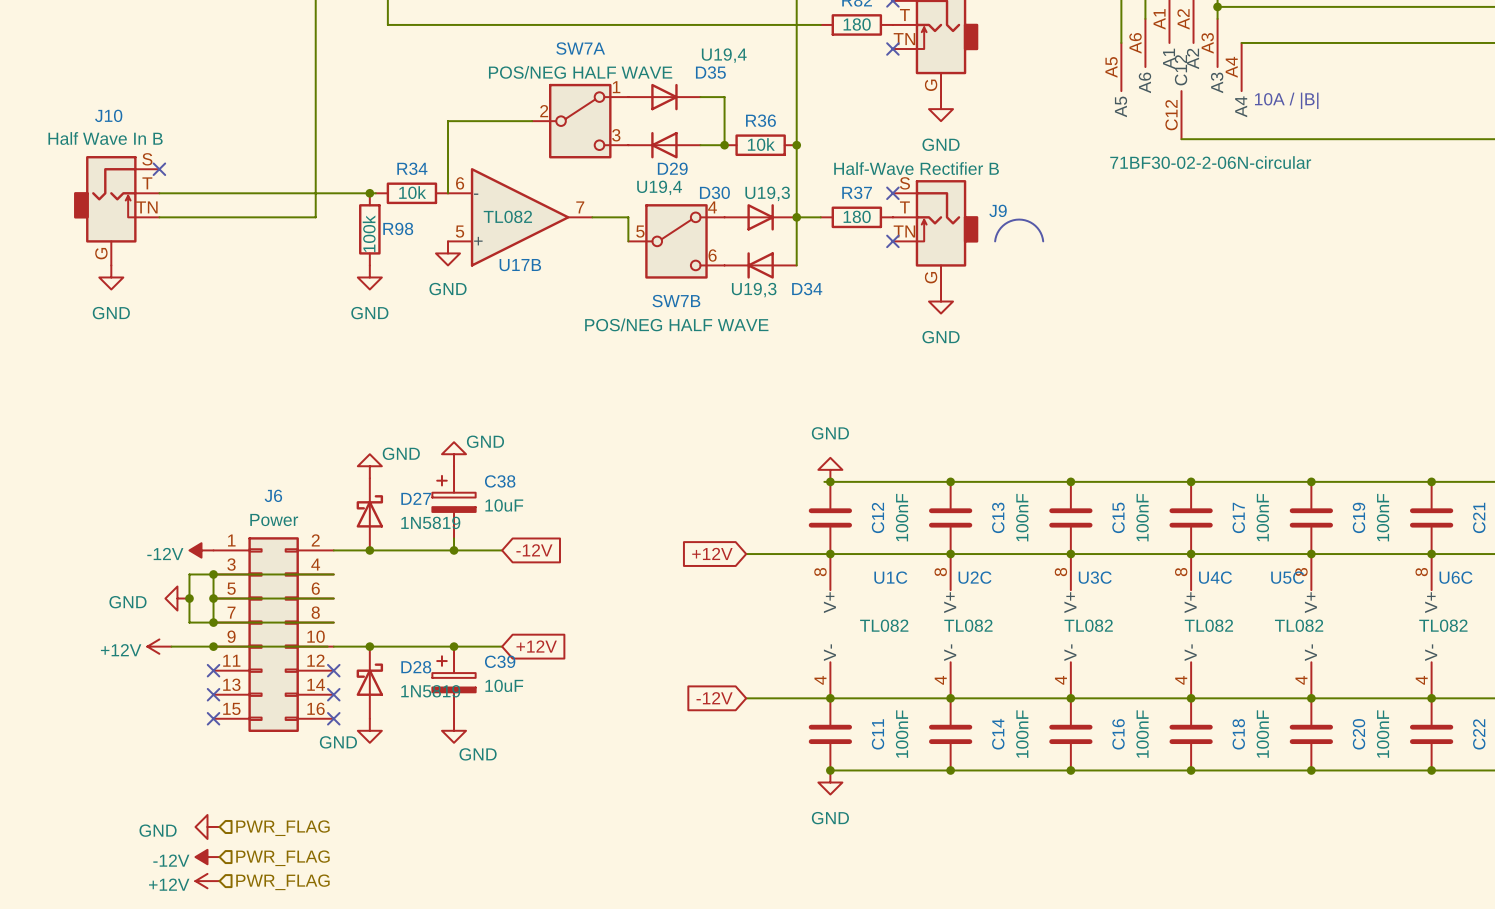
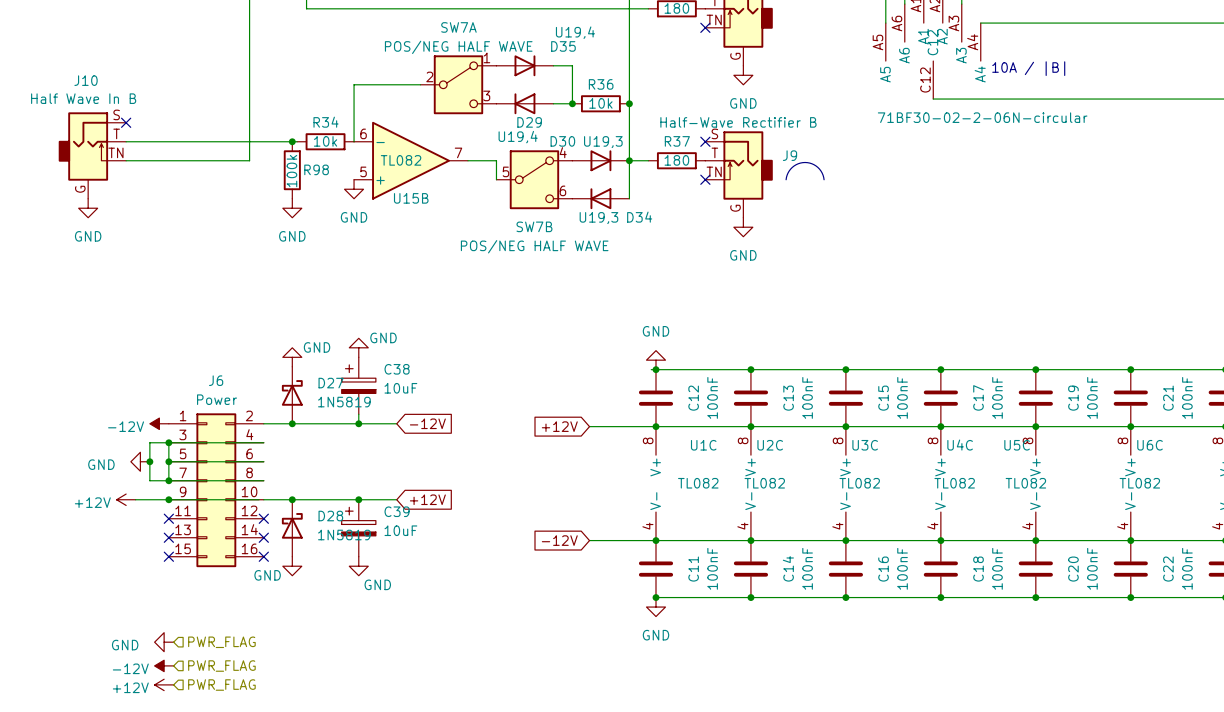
U17B name: U17B (520, 265) -> U15B (411, 198)

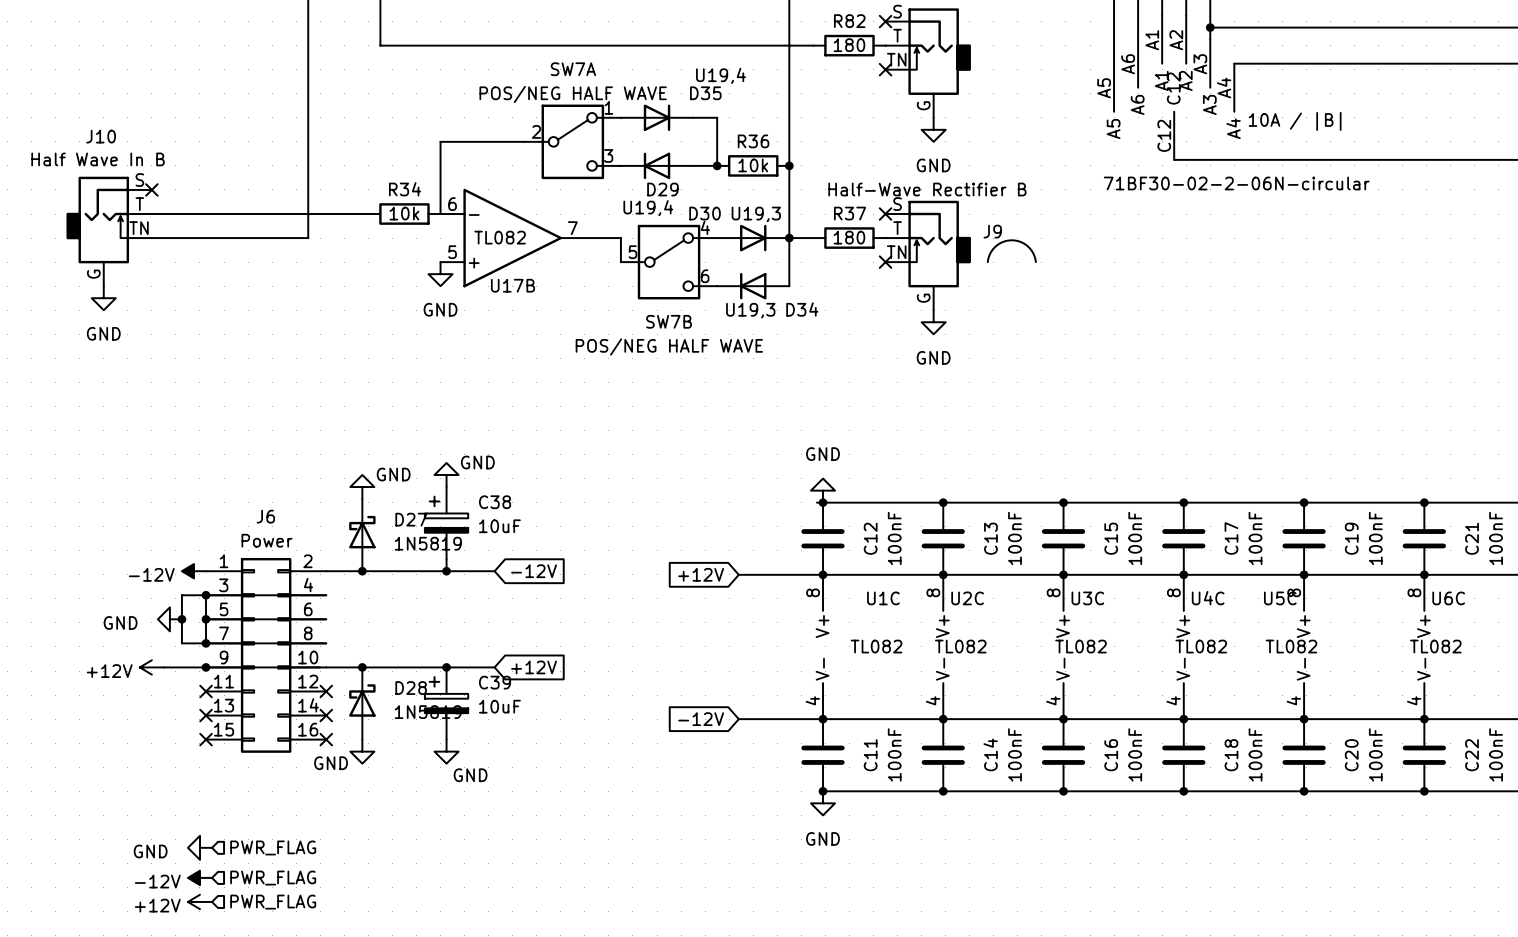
junction: (292, 141) -> none
R98: 100k (292, 170) -> none
U15B name: U15B (411, 198) -> U17B (512, 285)
power symbol: GND (292, 208) -> none

